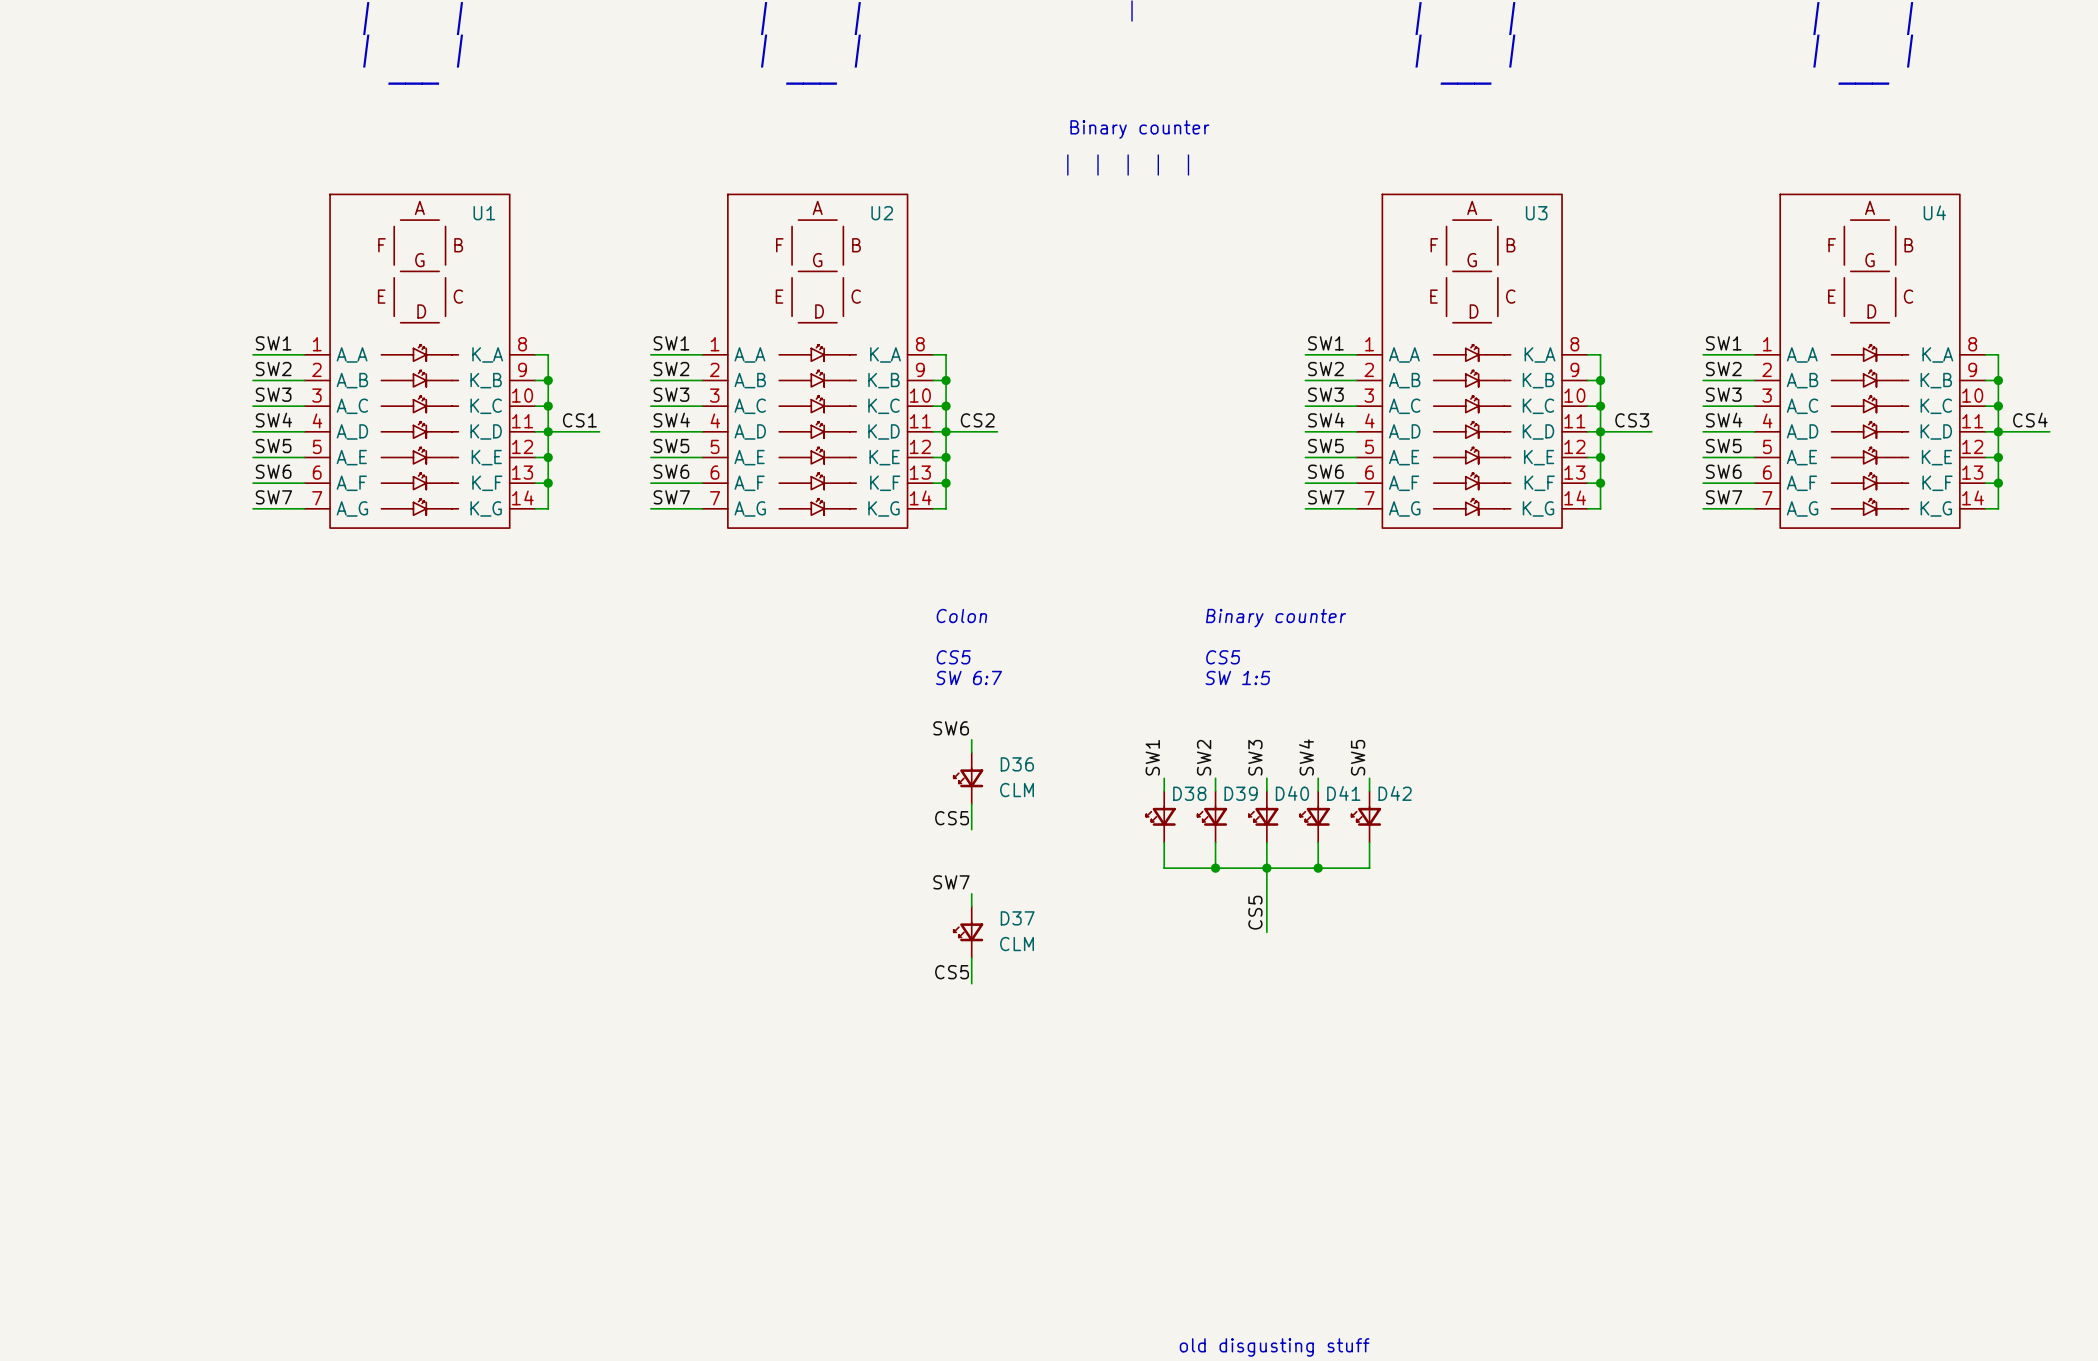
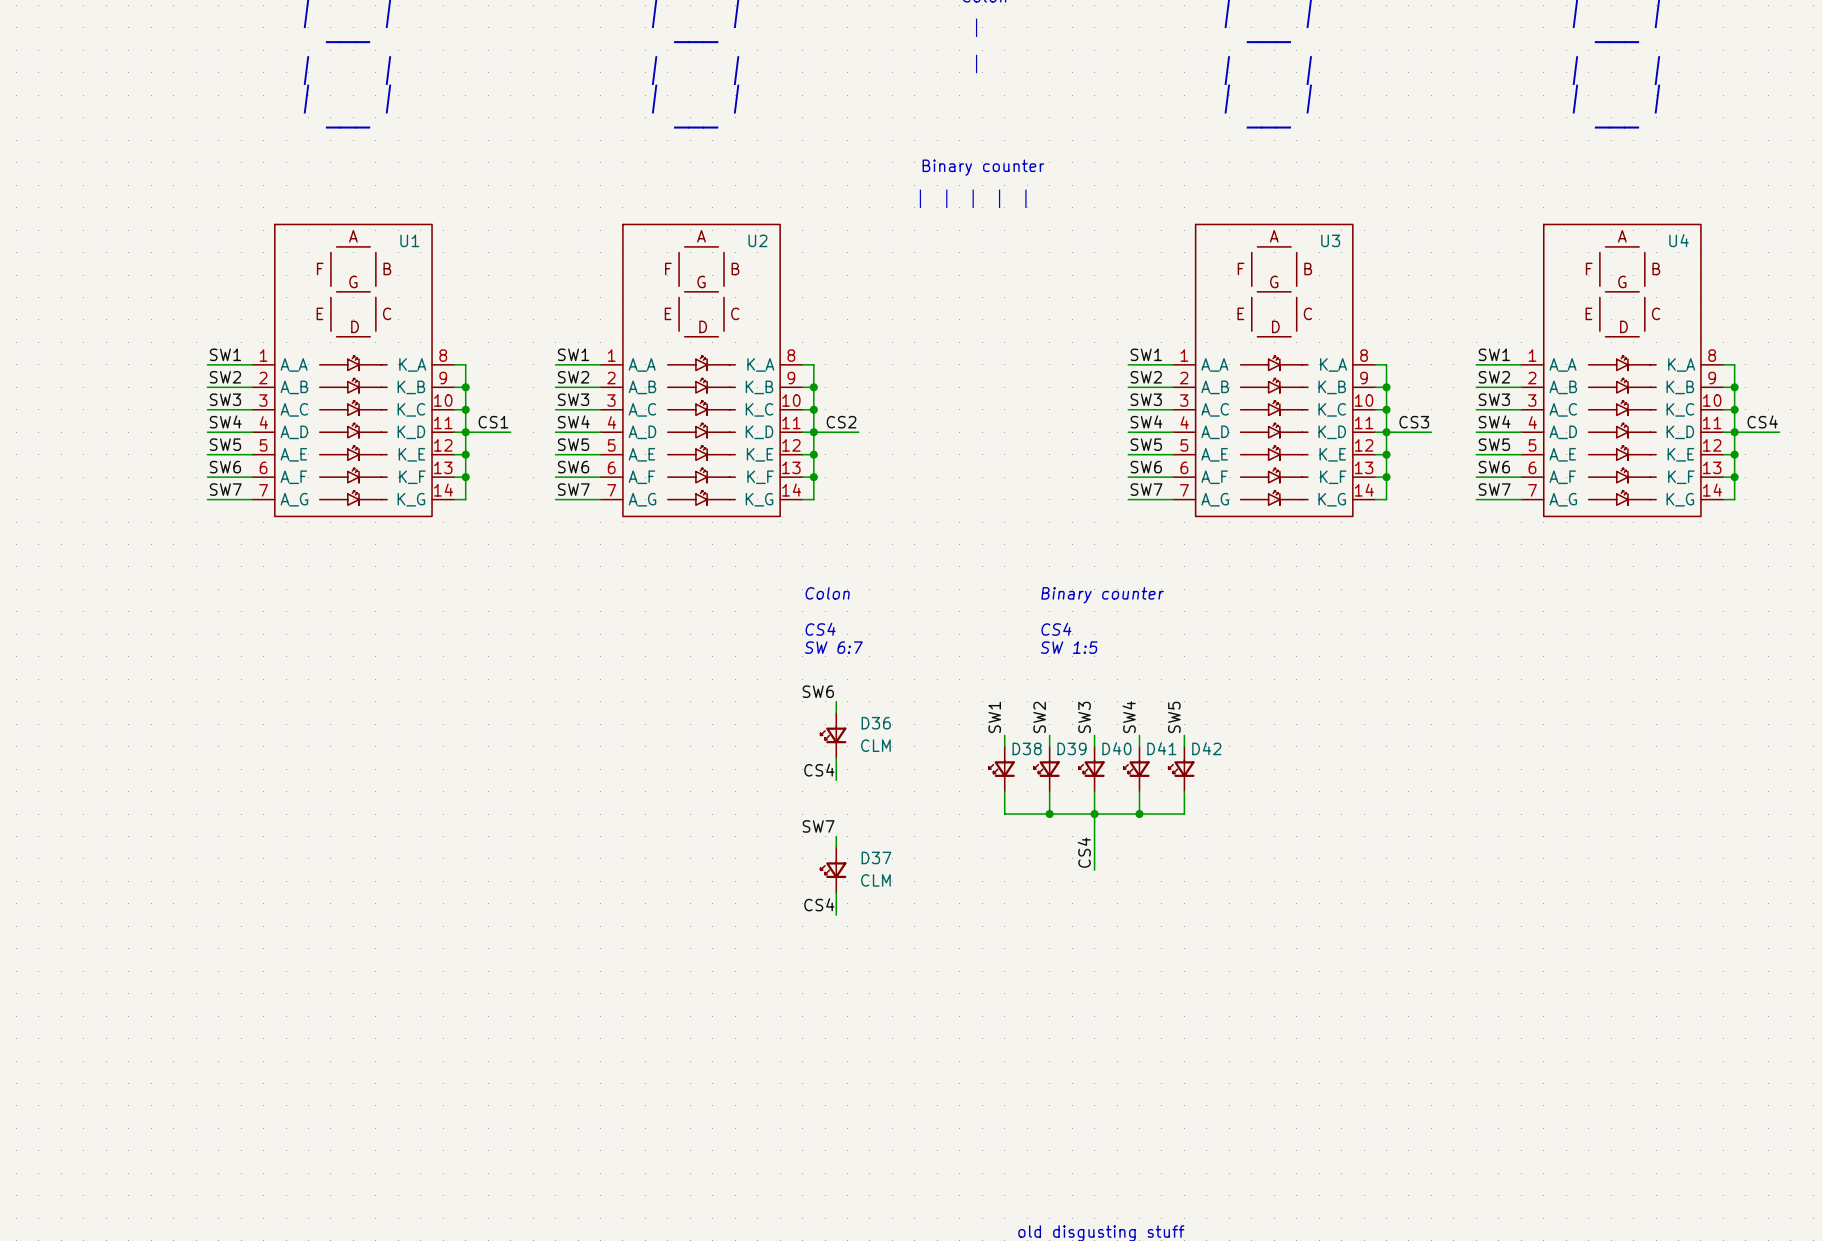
text: CS5 (953, 657) -> CS4 (820, 629)
text: CS5 (1223, 657) -> CS4 (1056, 629)
label: CS5 (952, 818) -> CS4 (819, 770)
label: CS5 (1255, 912) -> CS4 (1084, 852)
label: CS5 (952, 972) -> CS4 (819, 904)

